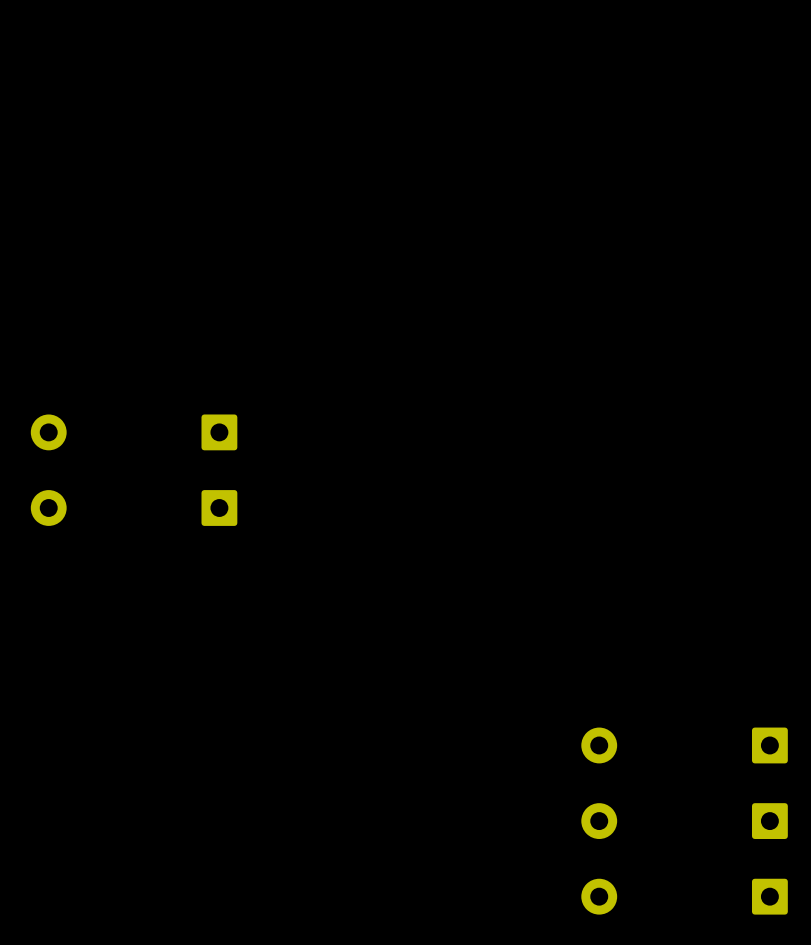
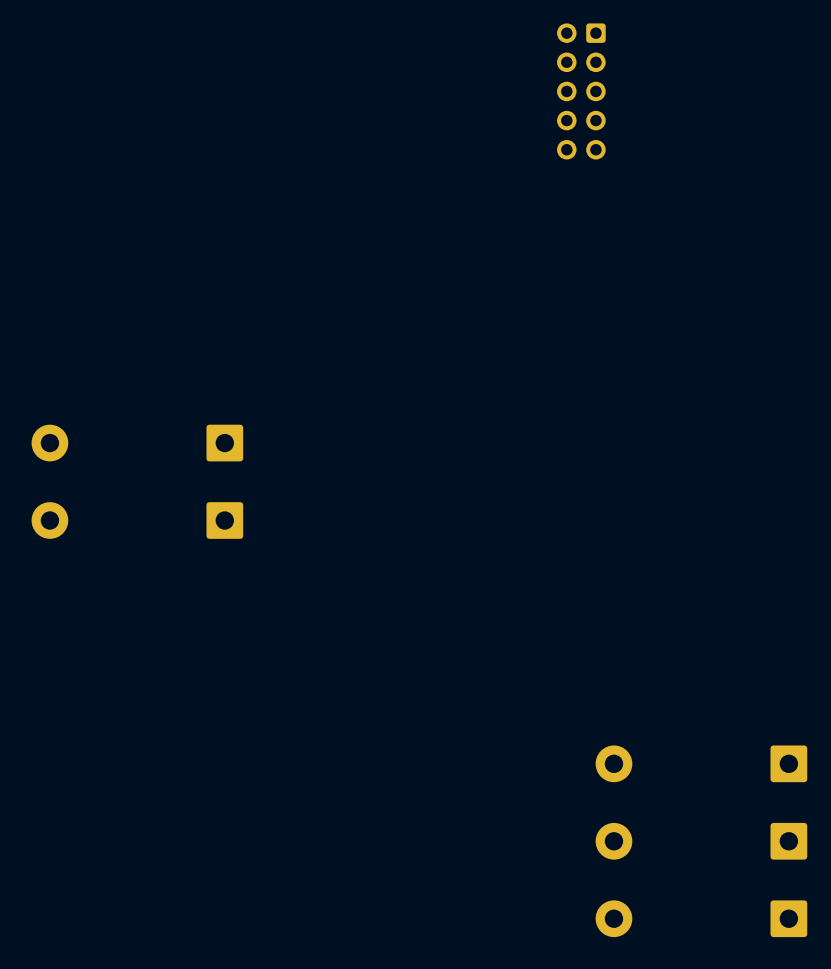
part: none -> (581, 91)

